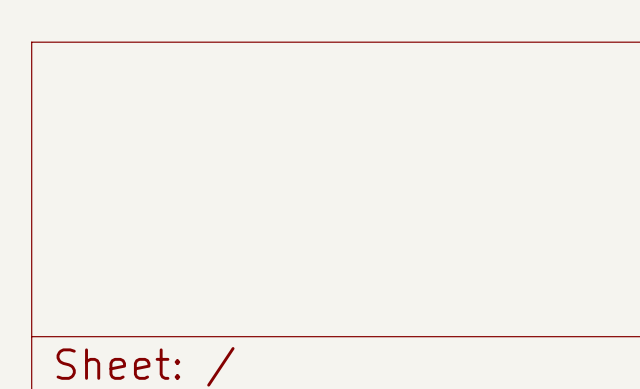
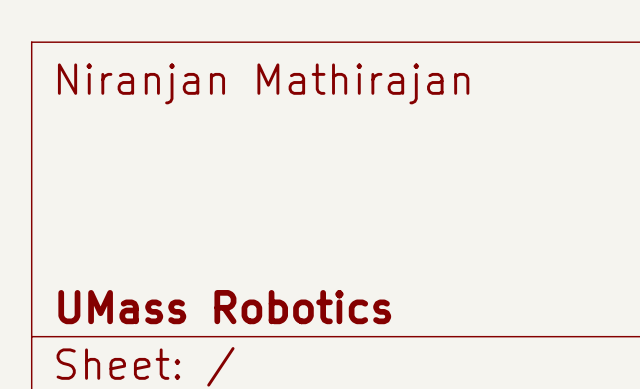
title block: none -> Niranjan Mathirajan (263, 83)
title block: none -> UMass Robotics (224, 307)

